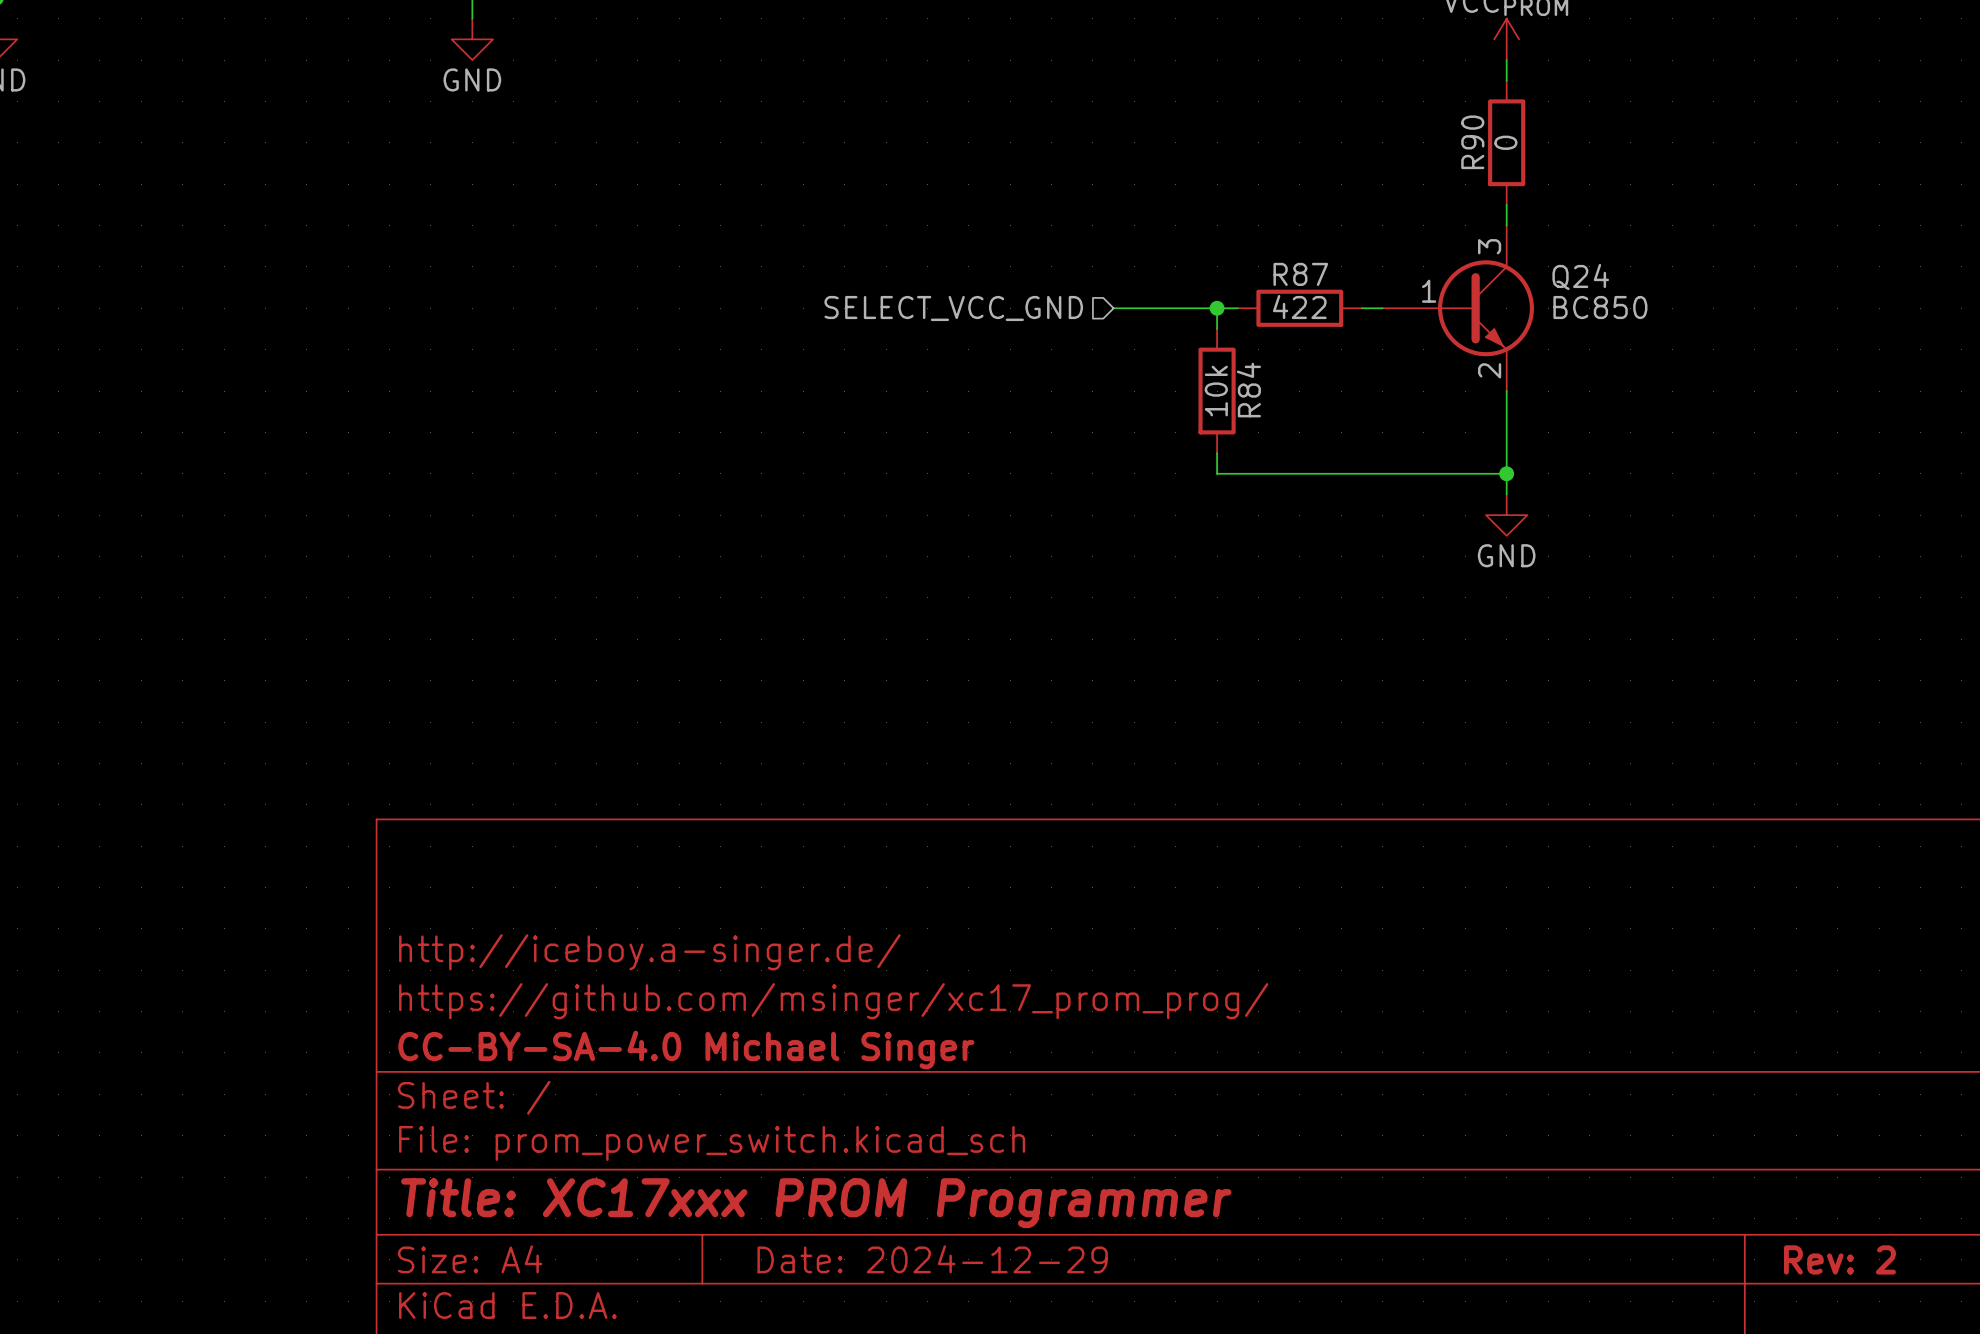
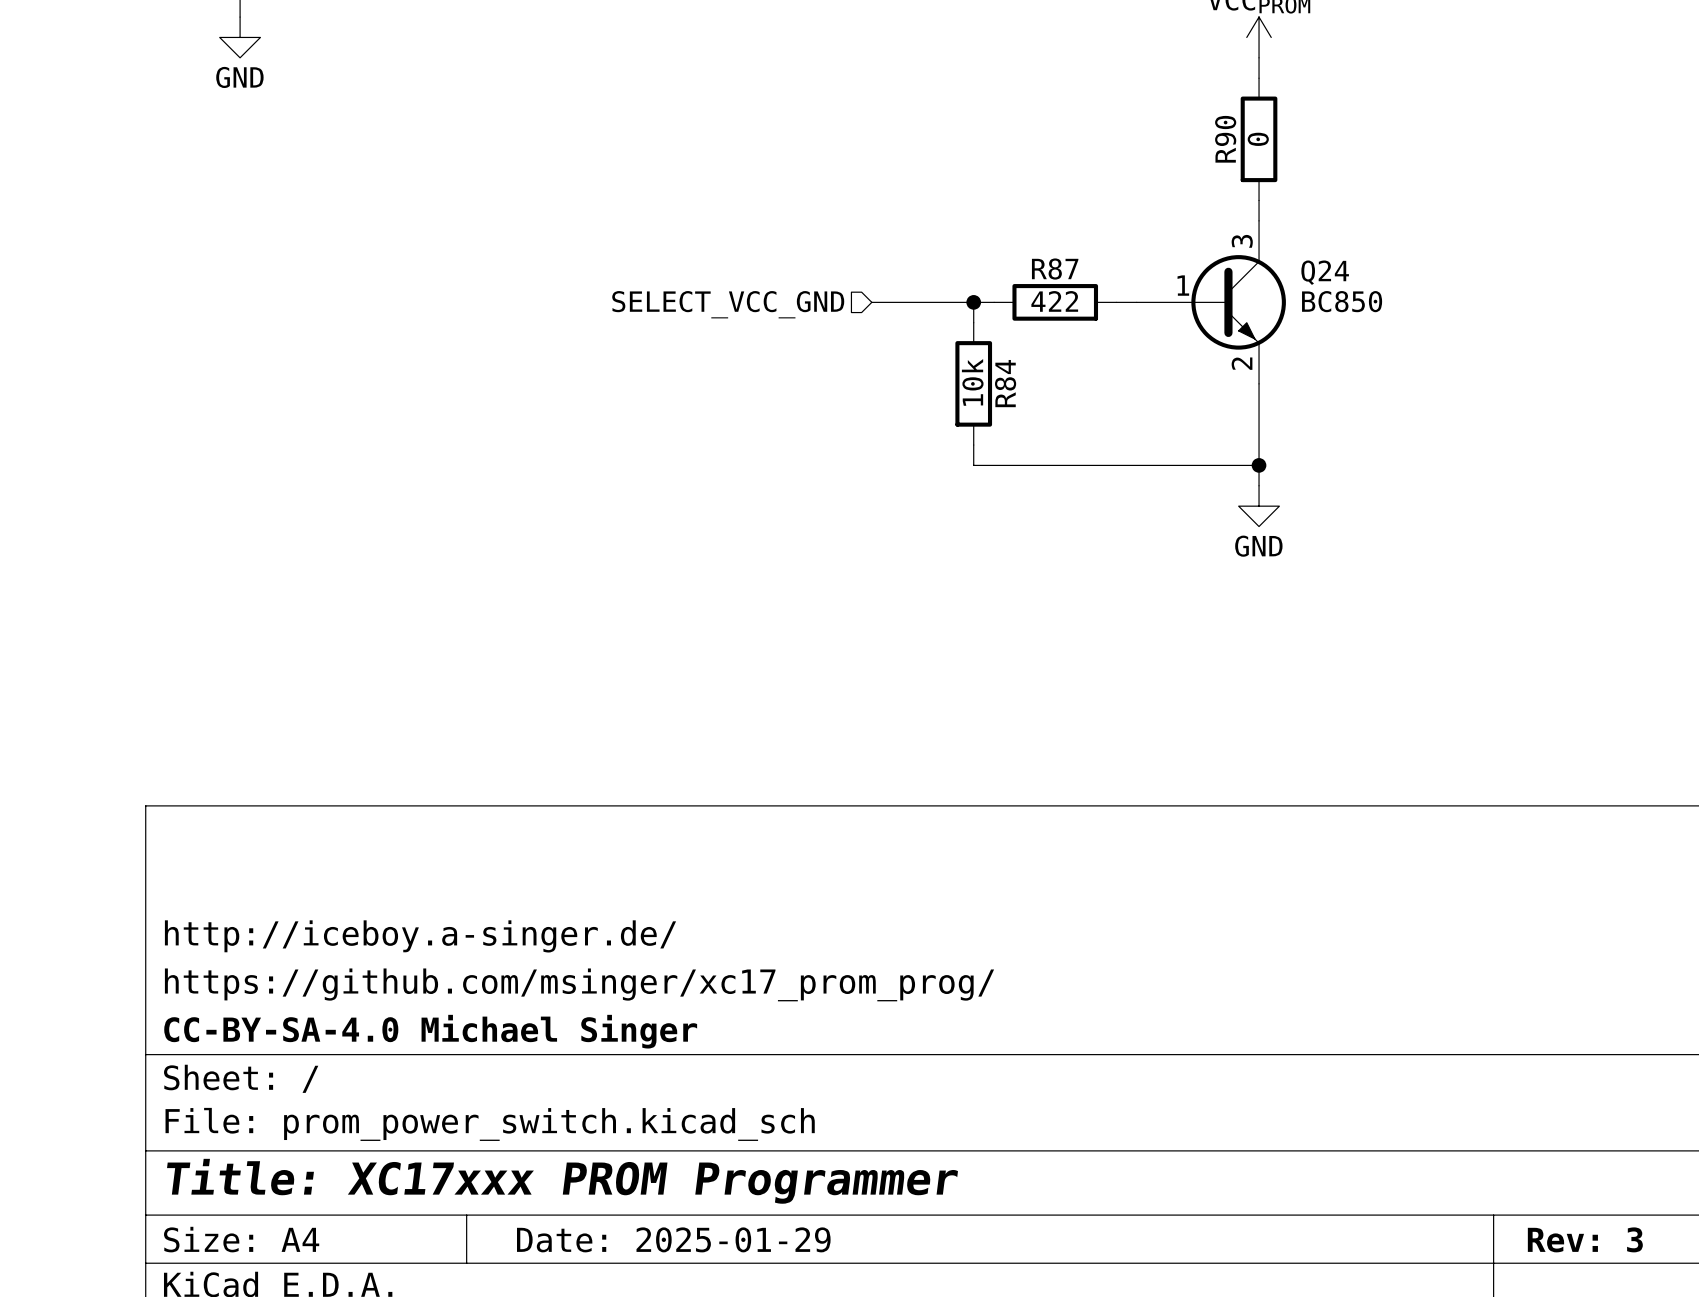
title block: Date: 2024-12-29 (932, 1259) -> Date: 2025-01-29 (673, 1239)
title block: Rev: 2 (1839, 1259) -> Rev: 3 (1585, 1239)

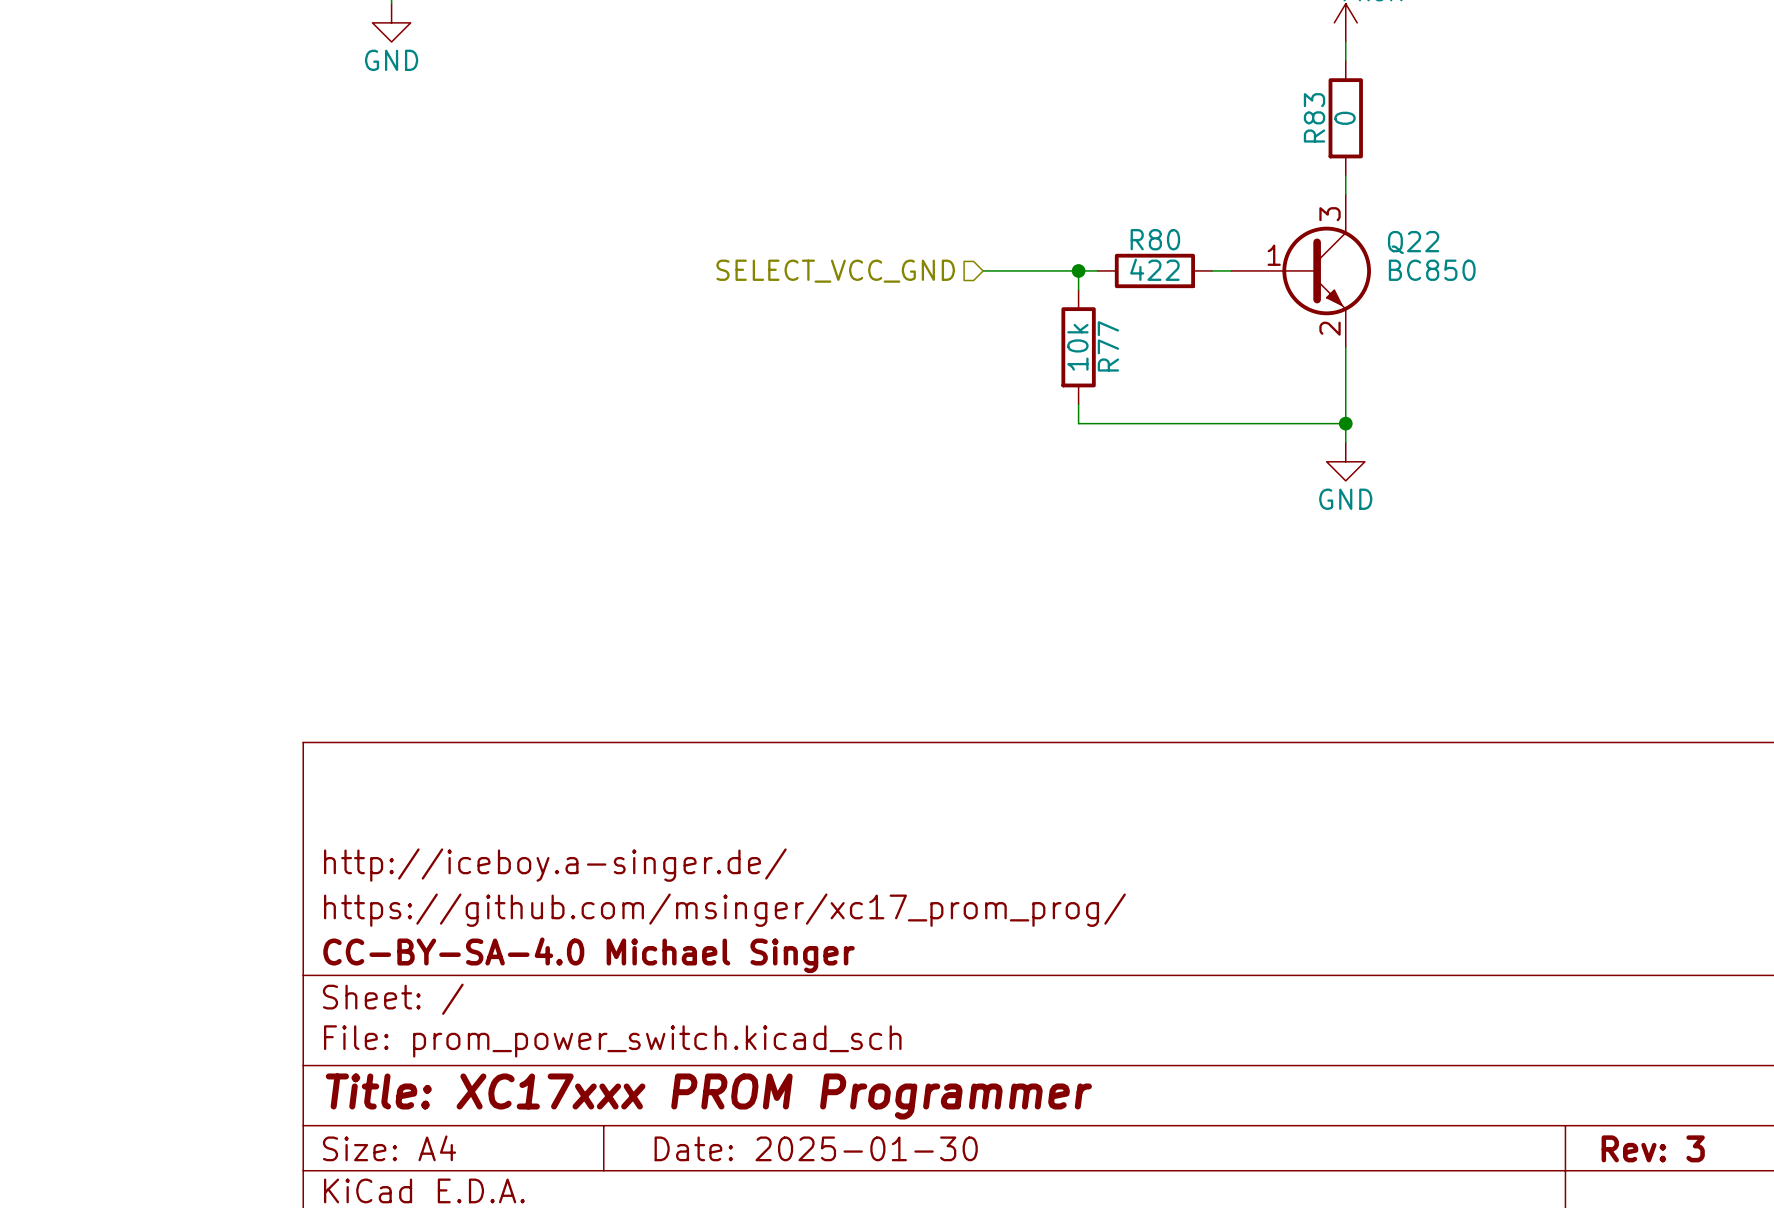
R90 name: R90 (1225, 139) -> R83 (1314, 117)
R87 name: R87 (1055, 269) -> R80 (1155, 239)
Q24 name: Q24 (1325, 272) -> Q22 (1413, 242)
R84 name: R84 (1005, 383) -> R77 (1108, 346)
title block: Date: 2025-01-29 (673, 1239) -> Date: 2025-01-30 (816, 1148)

